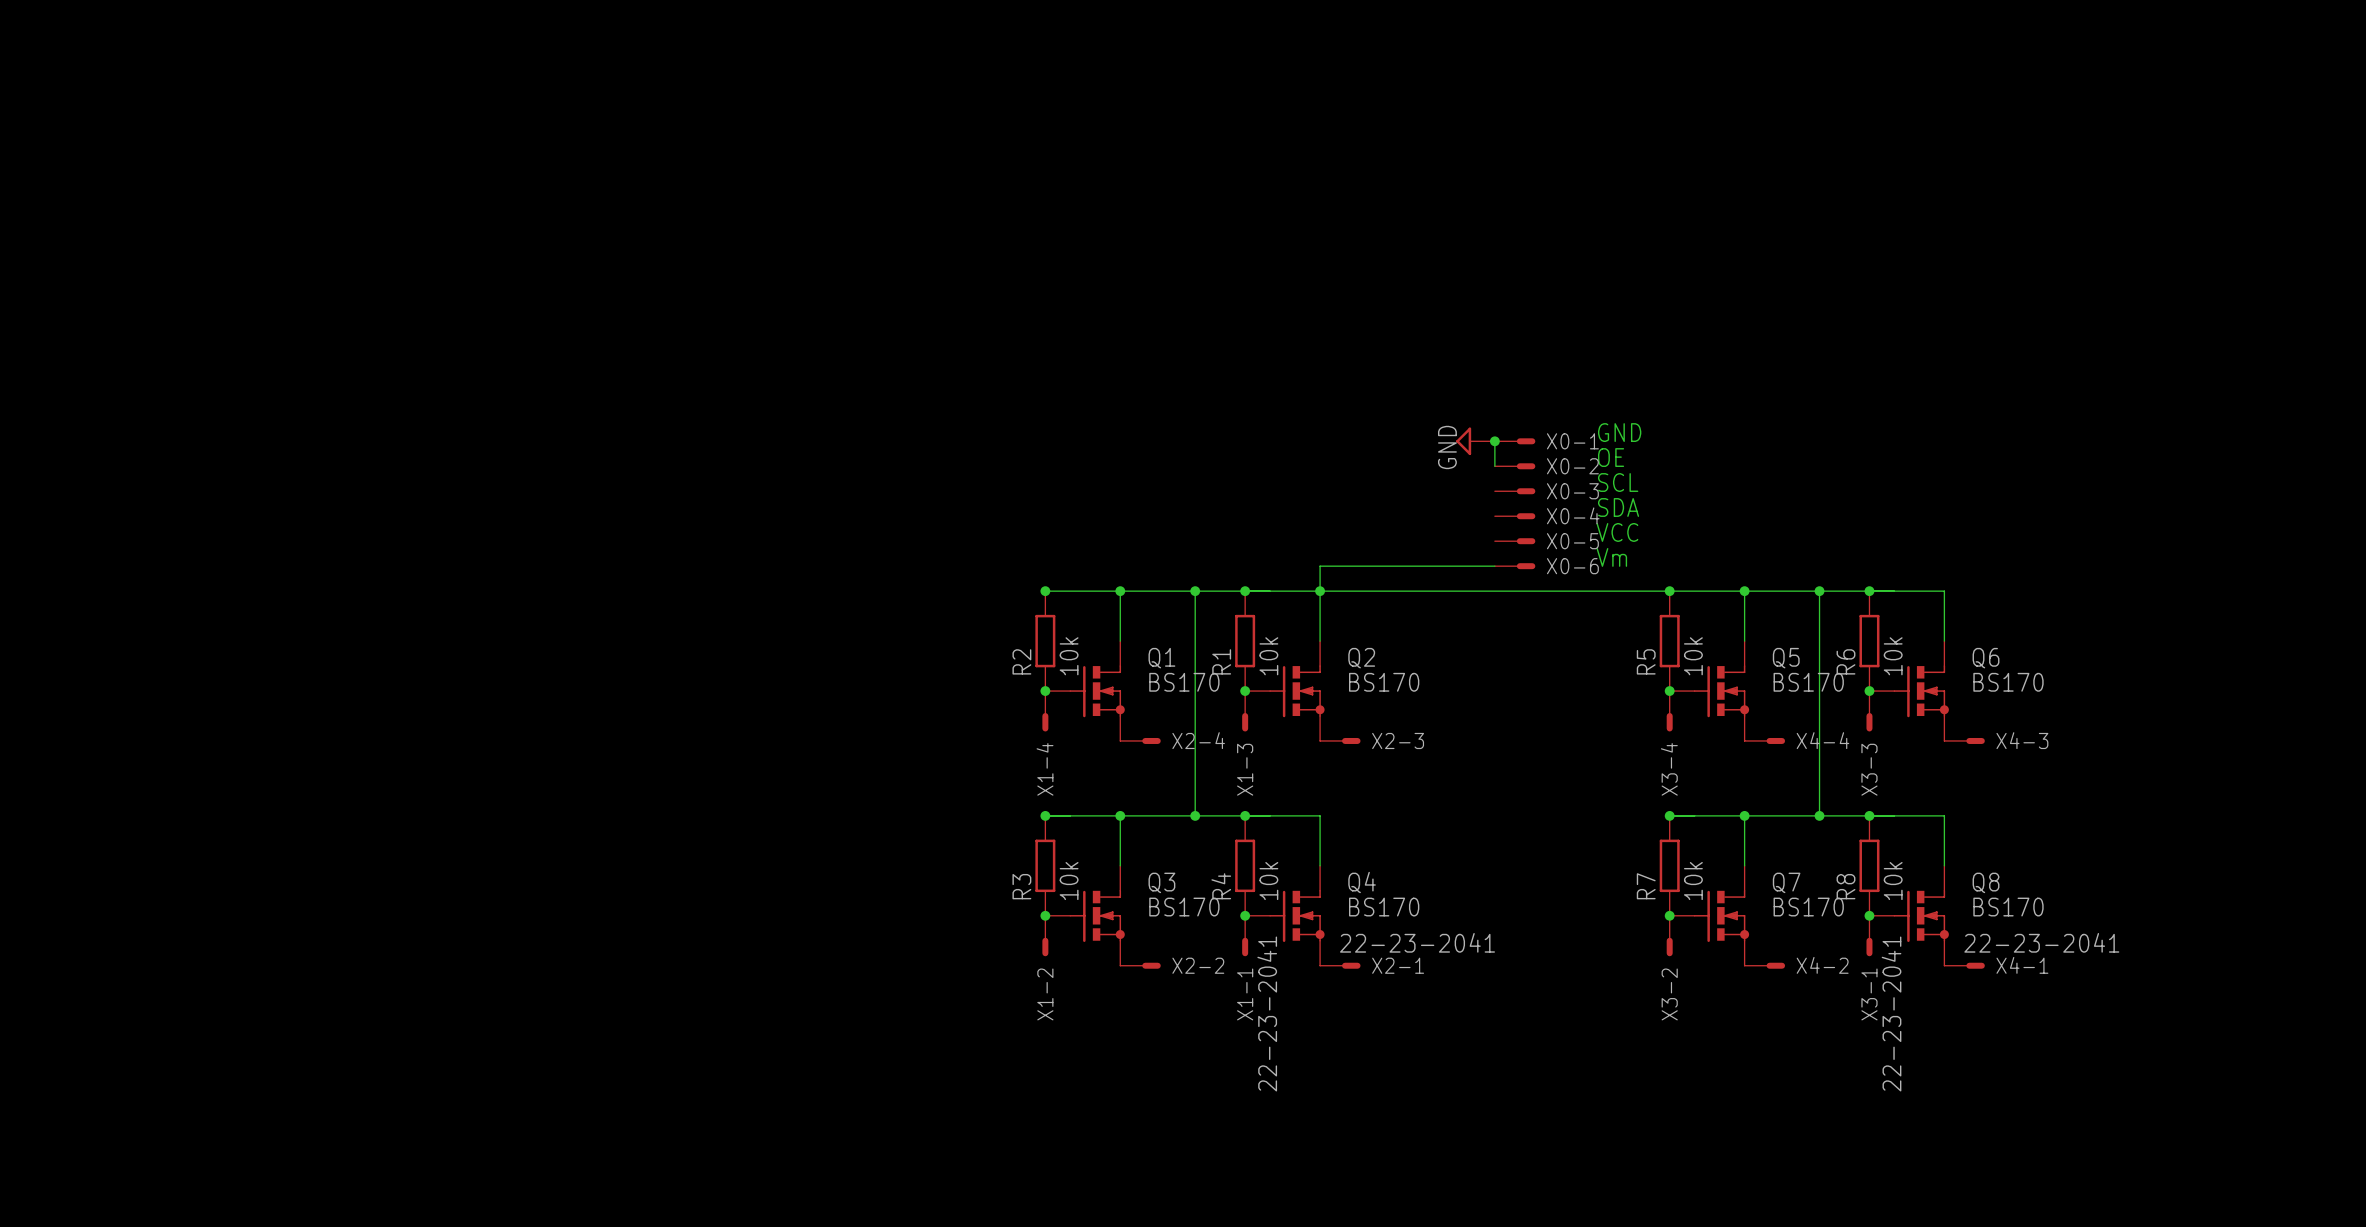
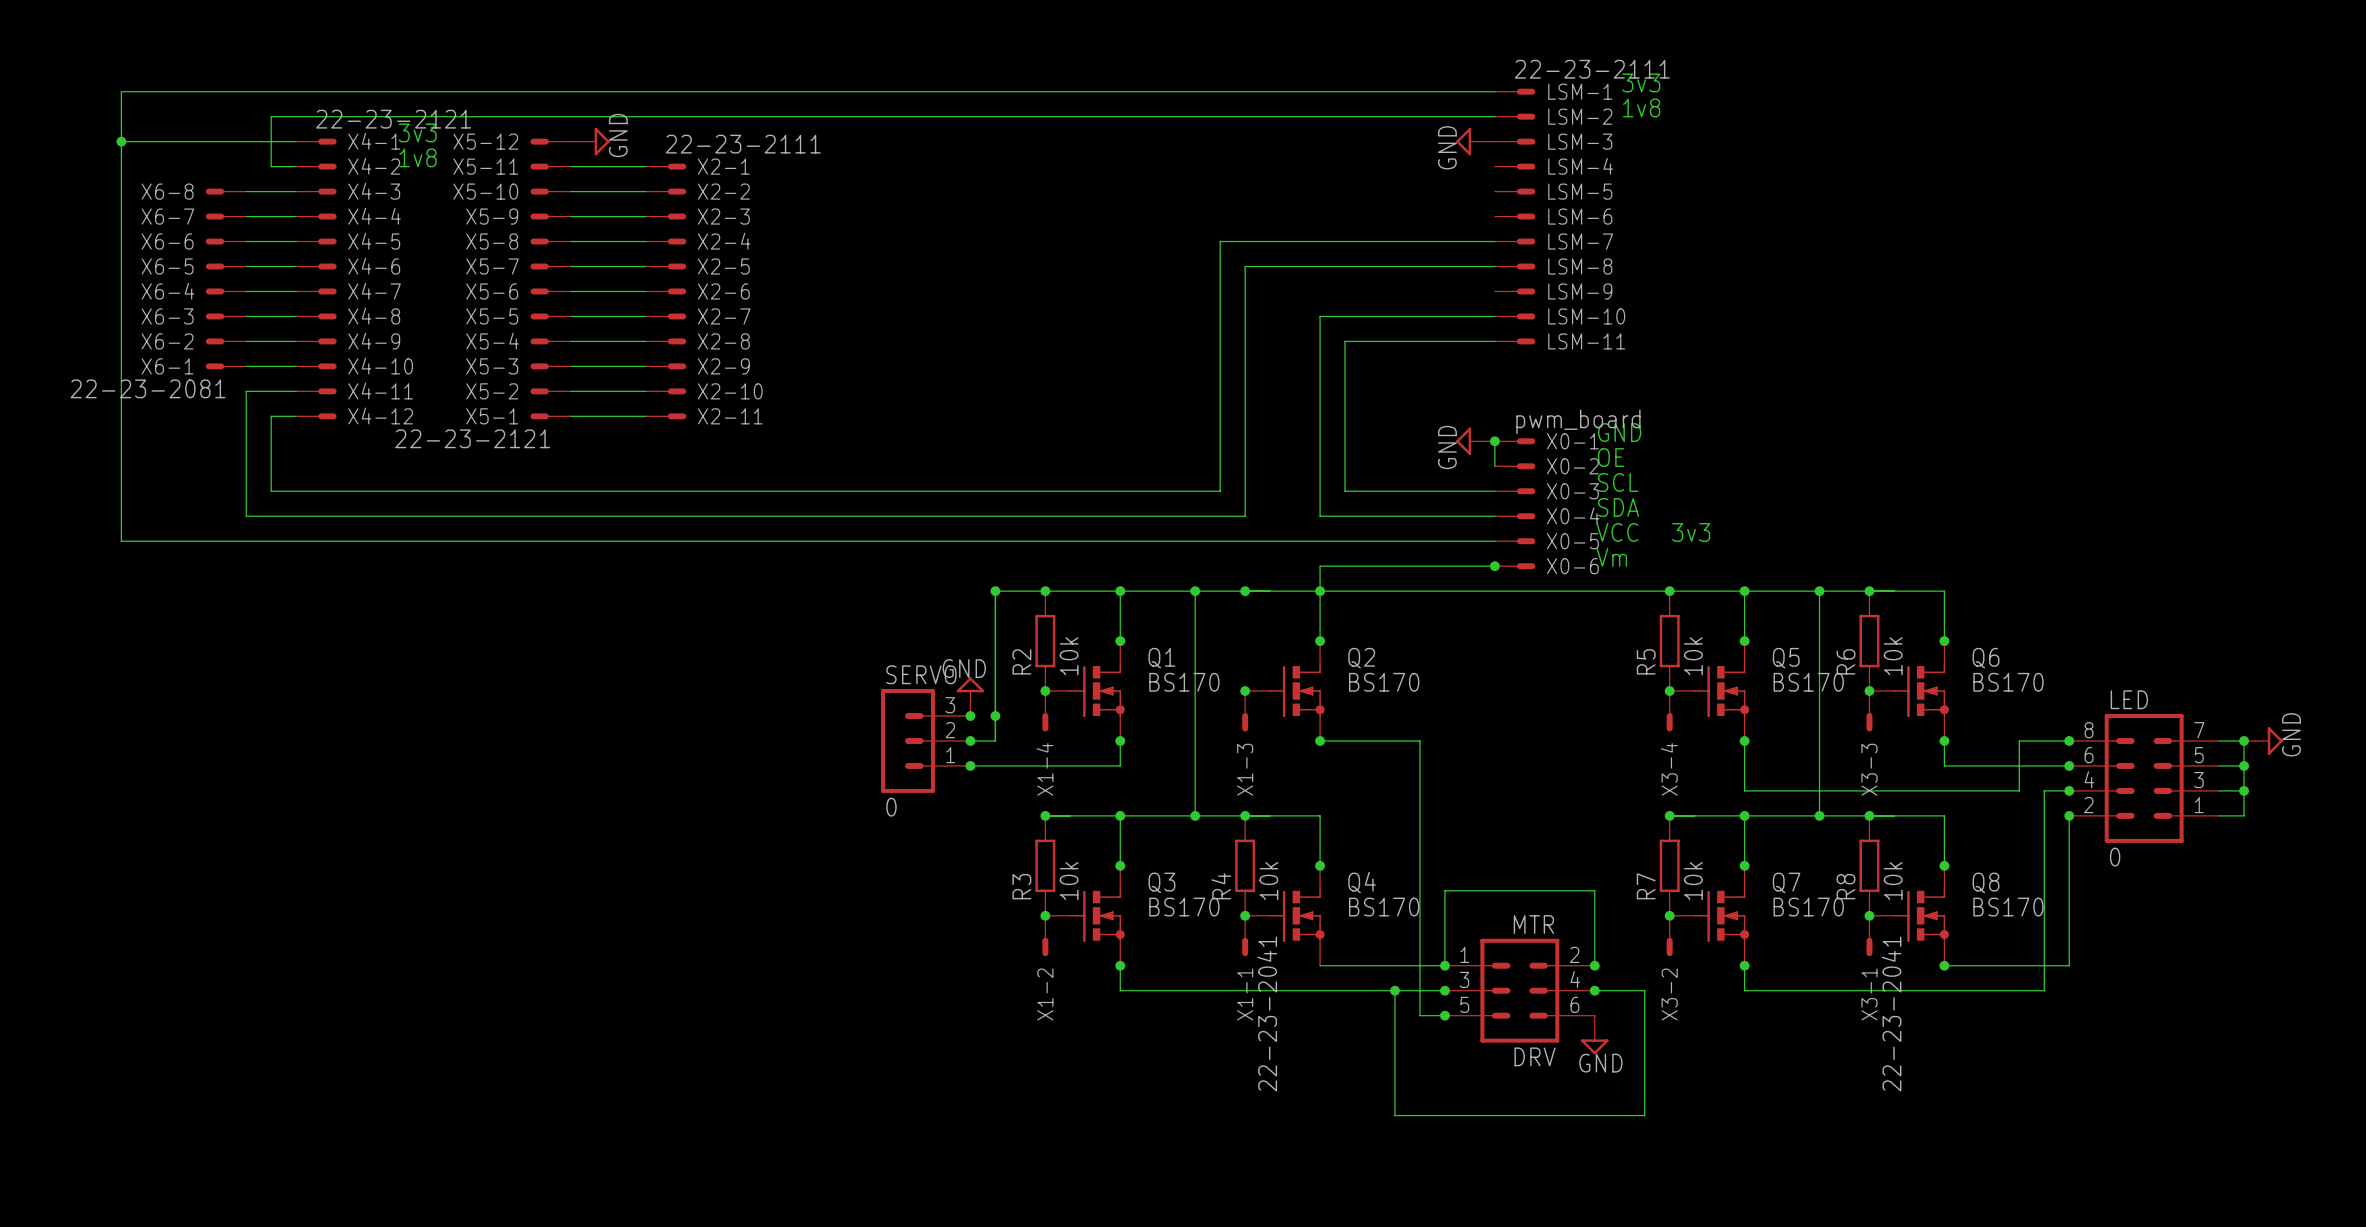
text: none -> 3v3 (1641, 82)
wire: none -> (1494, 91) (121, 91) (121, 541) (1494, 541)
LSM-1: none -> 22-23-2111 (1515, 91)
text: none -> 1v8 (1641, 107)
wire: none -> (1494, 116) (271, 116) (271, 166) (296, 166)
LSM-2: none -> (1515, 116)
text: none -> 3v3 (417, 132)
wire: none -> (121, 141) (296, 141)
junction: none -> (121, 141)
X5-12: none -> (550, 141)
power symbol: none -> GND (590, 141)
power symbol: none -> GND (1475, 141)
LSM-3: none -> (1515, 141)
text: none -> 1v8 (417, 157)
X5-11: none -> (550, 166)
wire: none -> (570, 166) (645, 166)
LSM-4: none -> (1515, 166)
X6-8: none -> (226, 191)
wire: none -> (246, 191) (296, 191)
X5-10: none -> (550, 191)
wire: none -> (570, 191) (645, 191)
LSM-5: none -> (1515, 191)
X6-7: none -> (226, 216)
wire: none -> (246, 216) (296, 216)
X5-9: none -> (550, 216)
wire: none -> (570, 216) (645, 216)
LSM-6: none -> (1515, 216)
X6-6: none -> (226, 241)
wire: none -> (246, 241) (296, 241)
X4-5: none -> (316, 241)
X5-8: none -> (550, 241)
wire: none -> (570, 241) (645, 241)
wire: none -> (1494, 241) (1220, 241) (1220, 491) (271, 491) (271, 416) (296, 416)
LSM-7: none -> (1515, 241)
X6-5: none -> (226, 266)
wire: none -> (246, 266) (296, 266)
X4-6: none -> (316, 266)
X5-7: none -> (550, 266)
wire: none -> (570, 266) (645, 266)
X2-5: none -> (666, 266)
wire: none -> (1494, 266) (1245, 266) (1245, 516) (246, 516) (246, 391) (296, 391)
LSM-8: none -> (1515, 266)
X6-4: none -> (226, 291)
wire: none -> (246, 291) (296, 291)
X4-7: none -> (316, 291)
X5-6: none -> (550, 291)
wire: none -> (570, 291) (645, 291)
X2-6: none -> (666, 291)
LSM-9: none -> (1515, 291)
X6-3: none -> (226, 316)
wire: none -> (246, 316) (296, 316)
X4-8: none -> (316, 316)
X5-5: none -> (550, 316)
wire: none -> (570, 316) (645, 316)
X2-7: none -> (666, 316)
wire: none -> (1494, 316) (1320, 316) (1320, 516) (1494, 516)
LSM-10: none -> (1515, 316)
X6-2: none -> (226, 341)
wire: none -> (246, 341) (296, 341)
X4-9: none -> (316, 341)
X5-4: none -> (550, 341)
wire: none -> (570, 341) (645, 341)
X2-8: none -> (666, 341)
wire: none -> (1494, 341) (1345, 341) (1345, 491) (1494, 491)
LSM-11: none -> (1515, 341)
X6-1: none -> 22-23-2081 (226, 366)
wire: none -> (246, 366) (296, 366)
X4-10: none -> (316, 366)
X5-3: none -> (550, 366)
wire: none -> (570, 366) (645, 366)
X2-9: none -> (666, 366)
X4-11: none -> (316, 391)
X5-2: none -> (550, 391)
wire: none -> (570, 391) (645, 391)
X2-10: none -> (666, 391)
X4-12: none -> (316, 416)
X5-1: none -> 22-23-2121 (550, 416)
wire: none -> (570, 416) (645, 416)
X2-11: none -> (666, 416)
X0-1 value: none -> pwm_board (1578, 421)
text: none -> 3v3 (1691, 532)
junction: none -> (1494, 566)
junction: none -> (995, 591)
wire: none -> (1045, 591) (995, 591) (995, 740) (970, 740)
junction: none -> (1120, 641)
R1: 10k (1245, 641) -> none
junction: none -> (1320, 641)
junction: none -> (1744, 641)
junction: none -> (1944, 641)
power symbol: none -> GND (970, 696)
junction: none -> (970, 716)
junction: none -> (995, 716)
SERVO: none -> 0 (925, 740)
junction: none -> (970, 740)
wire: none -> (1120, 740) (1120, 765) (970, 765)
junction: none -> (1120, 740)
X2-4 position: (1140, 740) -> (666, 241)
wire: none -> (1320, 740) (1419, 740) (1419, 1015) (1444, 1015)
junction: none -> (1320, 740)
X2-3 position: (1340, 740) -> (666, 216)
wire: none -> (1744, 740) (1744, 790) (2019, 790) (2019, 740) (2069, 740)
junction: none -> (1744, 740)
X4-4 position: (1764, 740) -> (316, 216)
wire: none -> (1944, 740) (1944, 765) (2069, 765)
junction: none -> (1944, 740)
X4-3 position: (1964, 740) -> (316, 191)
junction: none -> (2069, 740)
wire: none -> (2219, 740) (2244, 740) (2244, 815) (2219, 815)
junction: none -> (2244, 740)
power symbol: none -> GND (2263, 740)
junction: none -> (970, 765)
junction: none -> (2069, 765)
wire: none -> (2219, 765) (2244, 765)
junction: none -> (2244, 765)
LED: none -> 0 (2144, 778)
wire: none -> (2069, 790) (2044, 790) (2044, 990) (1744, 990) (1744, 965)
junction: none -> (2069, 790)
wire: none -> (2219, 790) (2244, 790)
junction: none -> (2244, 790)
wire: none -> (2069, 815) (2069, 965) (1944, 965)
junction: none -> (2069, 815)
junction: none -> (1120, 865)
junction: none -> (1320, 865)
junction: none -> (1744, 865)
junction: none -> (1944, 865)
X2-1 value: 22-23-2041 (1417, 942) -> 22-23-2111 (743, 144)
X4-1 value: 22-23-2041 (2041, 942) -> 22-23-2121 (393, 119)
wire: none -> (1120, 965) (1120, 990) (1444, 990)
junction: none -> (1120, 965)
X2-2 position: (1140, 965) -> (666, 191)
wire: none -> (1320, 965) (1444, 965) (1444, 890) (1594, 890) (1594, 965)
X2-1 position: (1340, 965) -> (666, 166)
junction: none -> (1444, 965)
junction: none -> (1594, 965)
junction: none -> (1744, 965)
X4-2 position: (1764, 965) -> (316, 166)
junction: none -> (1944, 965)
X4-1 position: (1964, 965) -> (316, 141)
wire: none -> (1394, 990) (1394, 1115) (1644, 1115) (1644, 990) (1594, 990)
junction: none -> (1394, 990)
junction: none -> (1444, 990)
DRV: none -> MTR (1519, 990)
junction: none -> (1594, 990)
junction: none -> (1444, 1015)
power symbol: none -> GND (1594, 1035)

